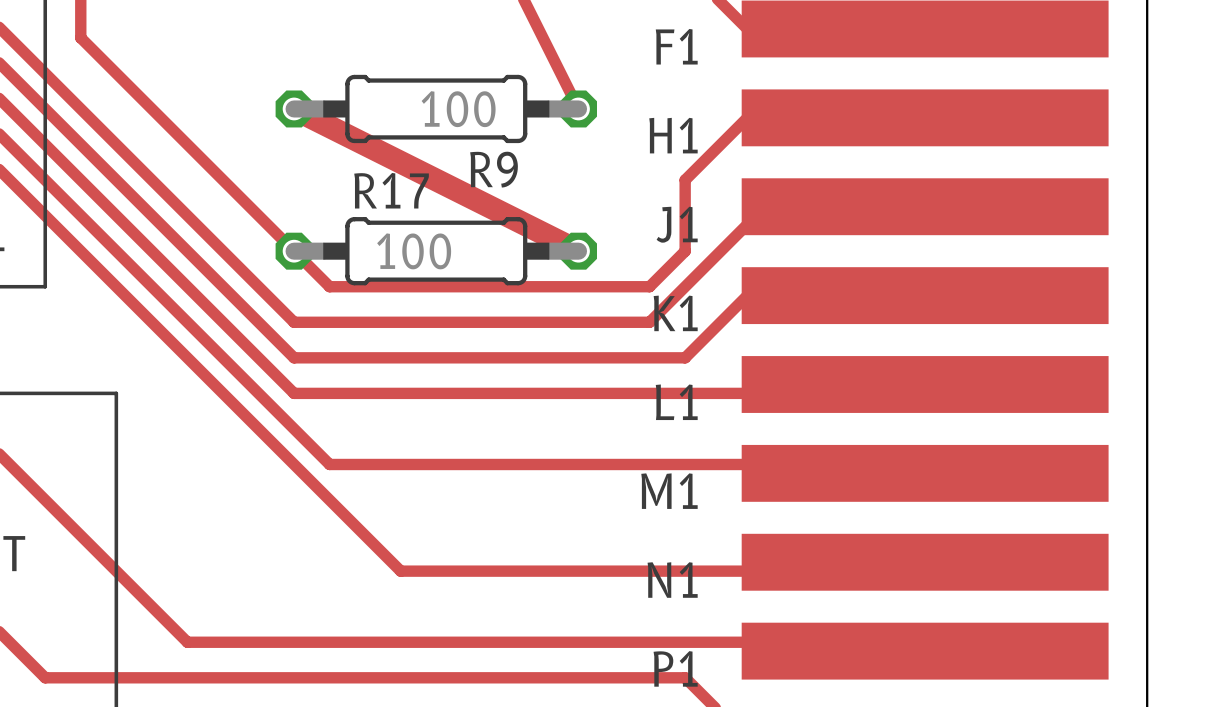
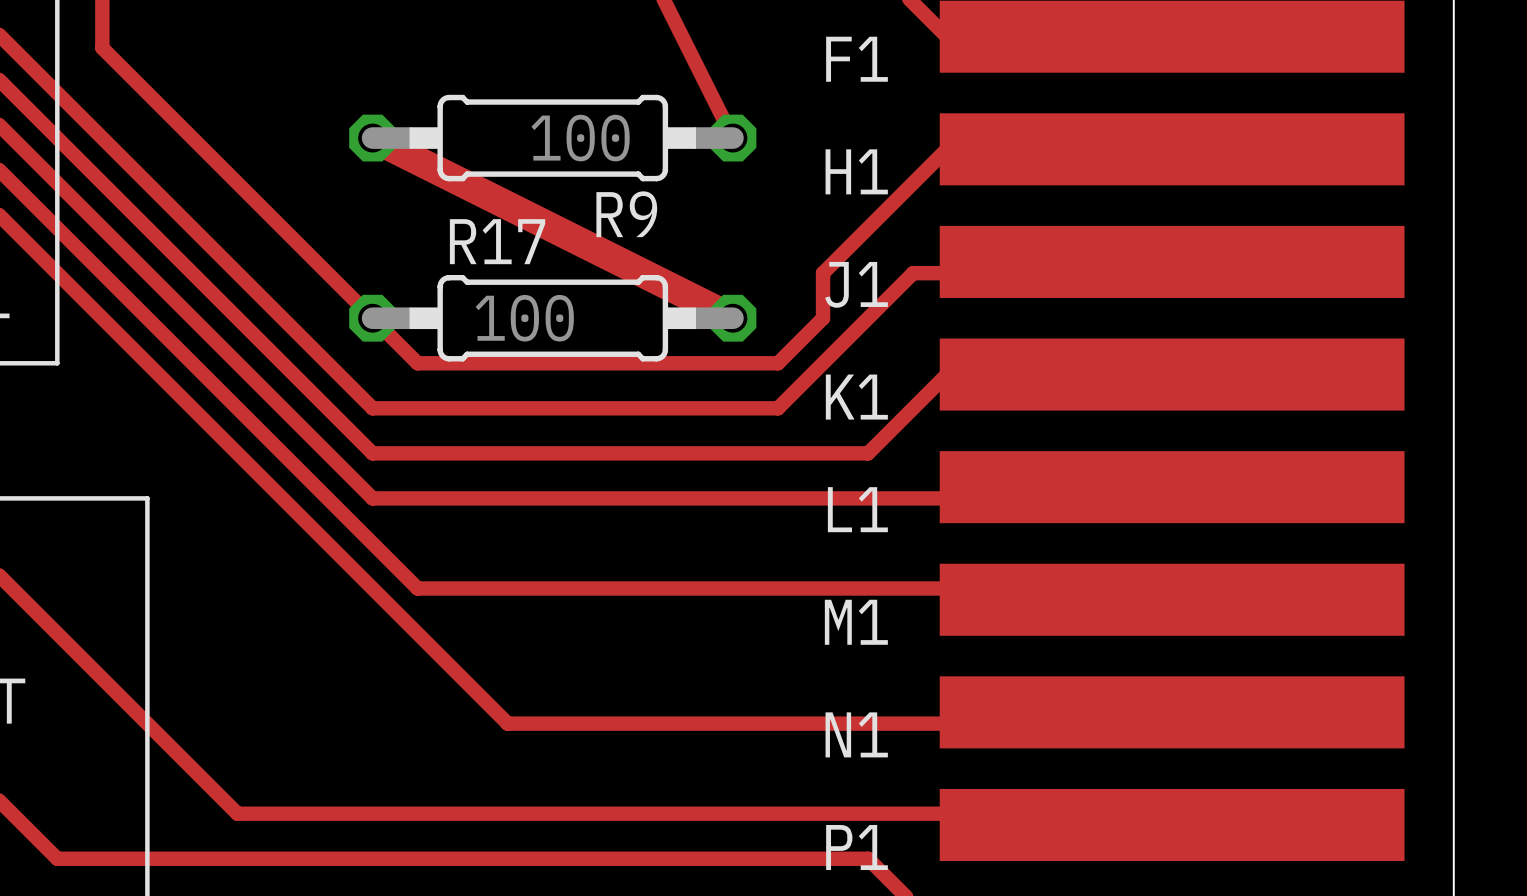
track: (685, 180) (685, 251) -> (868, 228) (823, 273) (823, 318) (777, 363)
track: (756, 215) (649, 322) (614, 322) -> (958, 273) (913, 273) (868, 318)
track: (614, 286) (649, 286) -> (777, 408) (823, 363)

